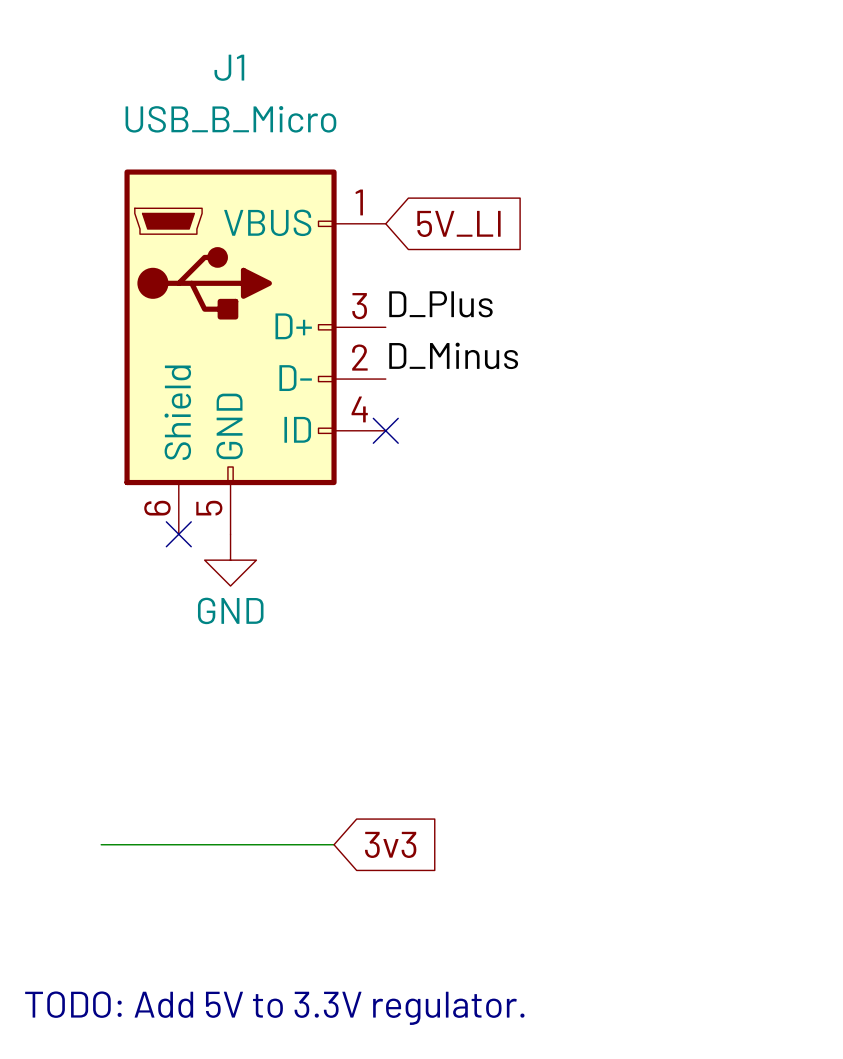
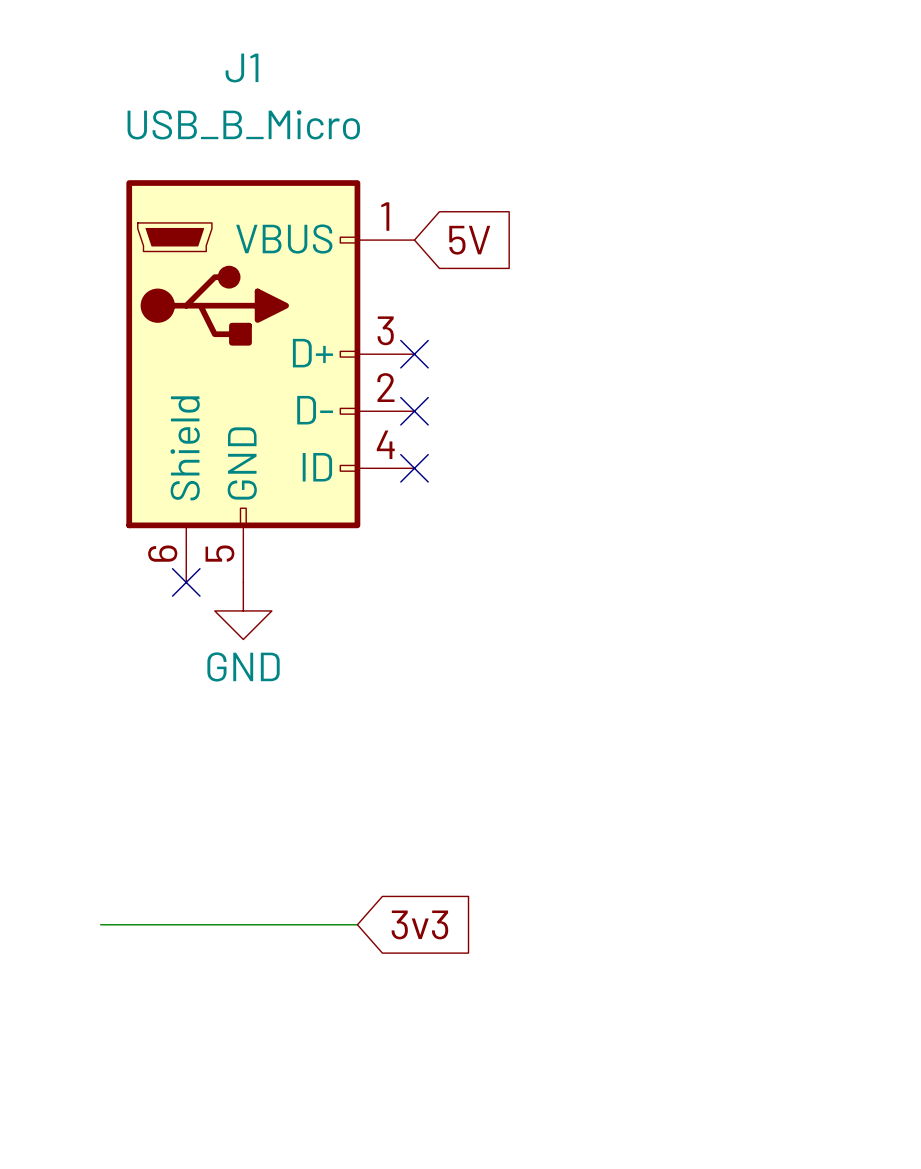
global label: 5V_LI (458, 223) -> 5V (469, 240)
label: D_Plus (440, 304) -> none
no-connect mark: none -> (414, 354)
label: D_Minus (453, 355) -> none
no-connect mark: none -> (414, 411)
text: TODO: Add 5V to 3.3V regulator. (274, 1008) -> none

